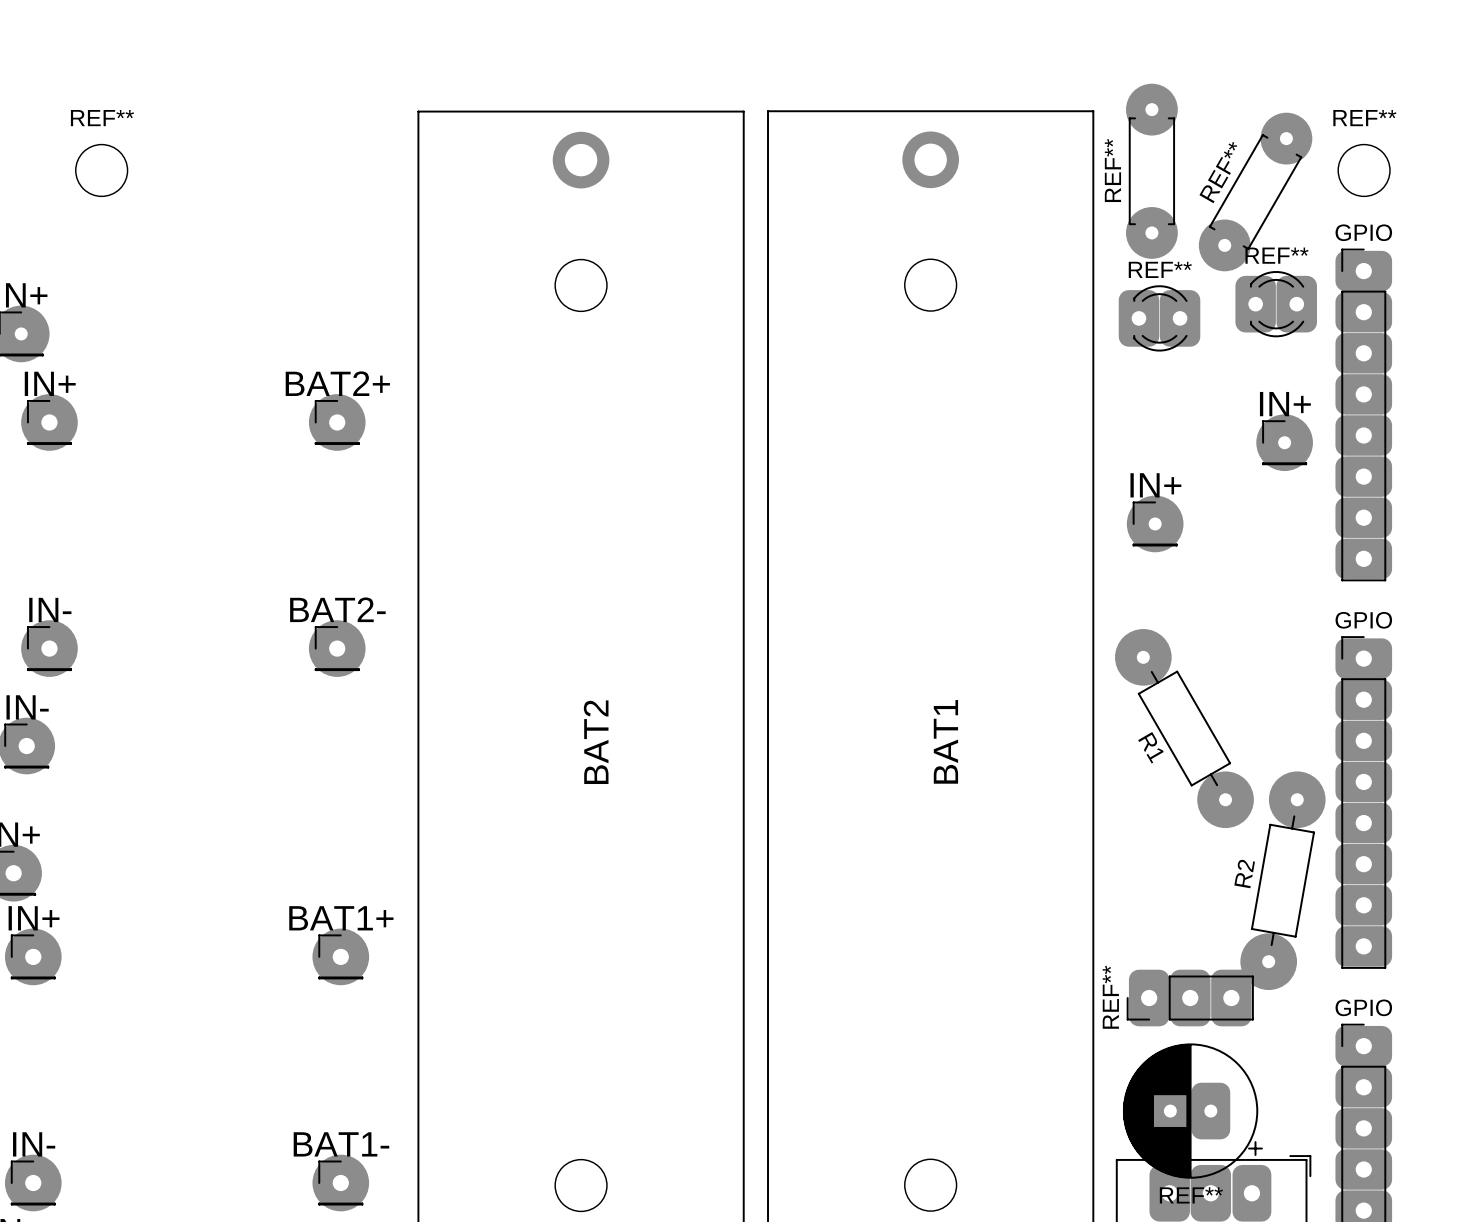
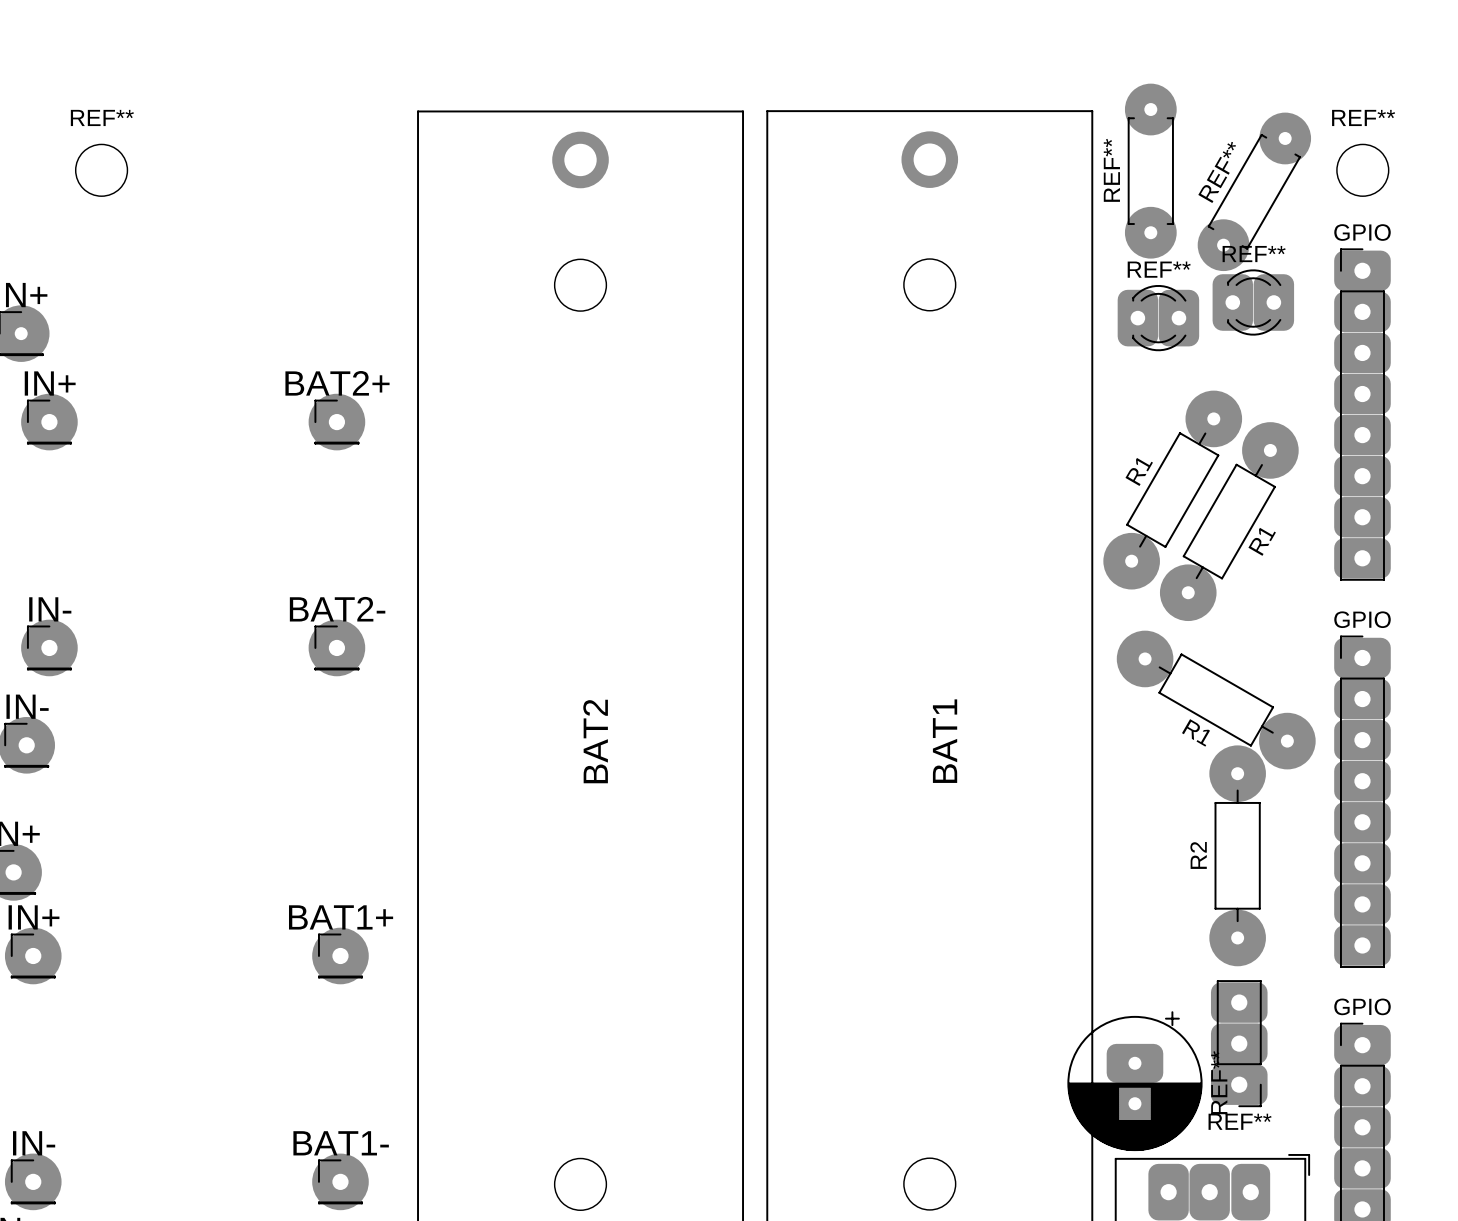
REF**: none -> (1253, 302)
REF**: (1276, 304) -> none
IN+: (1284, 442) -> none
R1: none -> (1172, 490)
R1: none -> (1229, 521)
IN+: (1155, 523) -> none
R1: none -> (1216, 700)
R1: (1184, 728) -> none
R2 rotation: 0° (1282, 880) -> 10° counterclockwise (1237, 855)
REF** rotation: 0° (1190, 998) -> 90° counterclockwise (1239, 1043)
REF** rotation: 0° (1192, 1111) -> 90° counterclockwise (1134, 1081)

